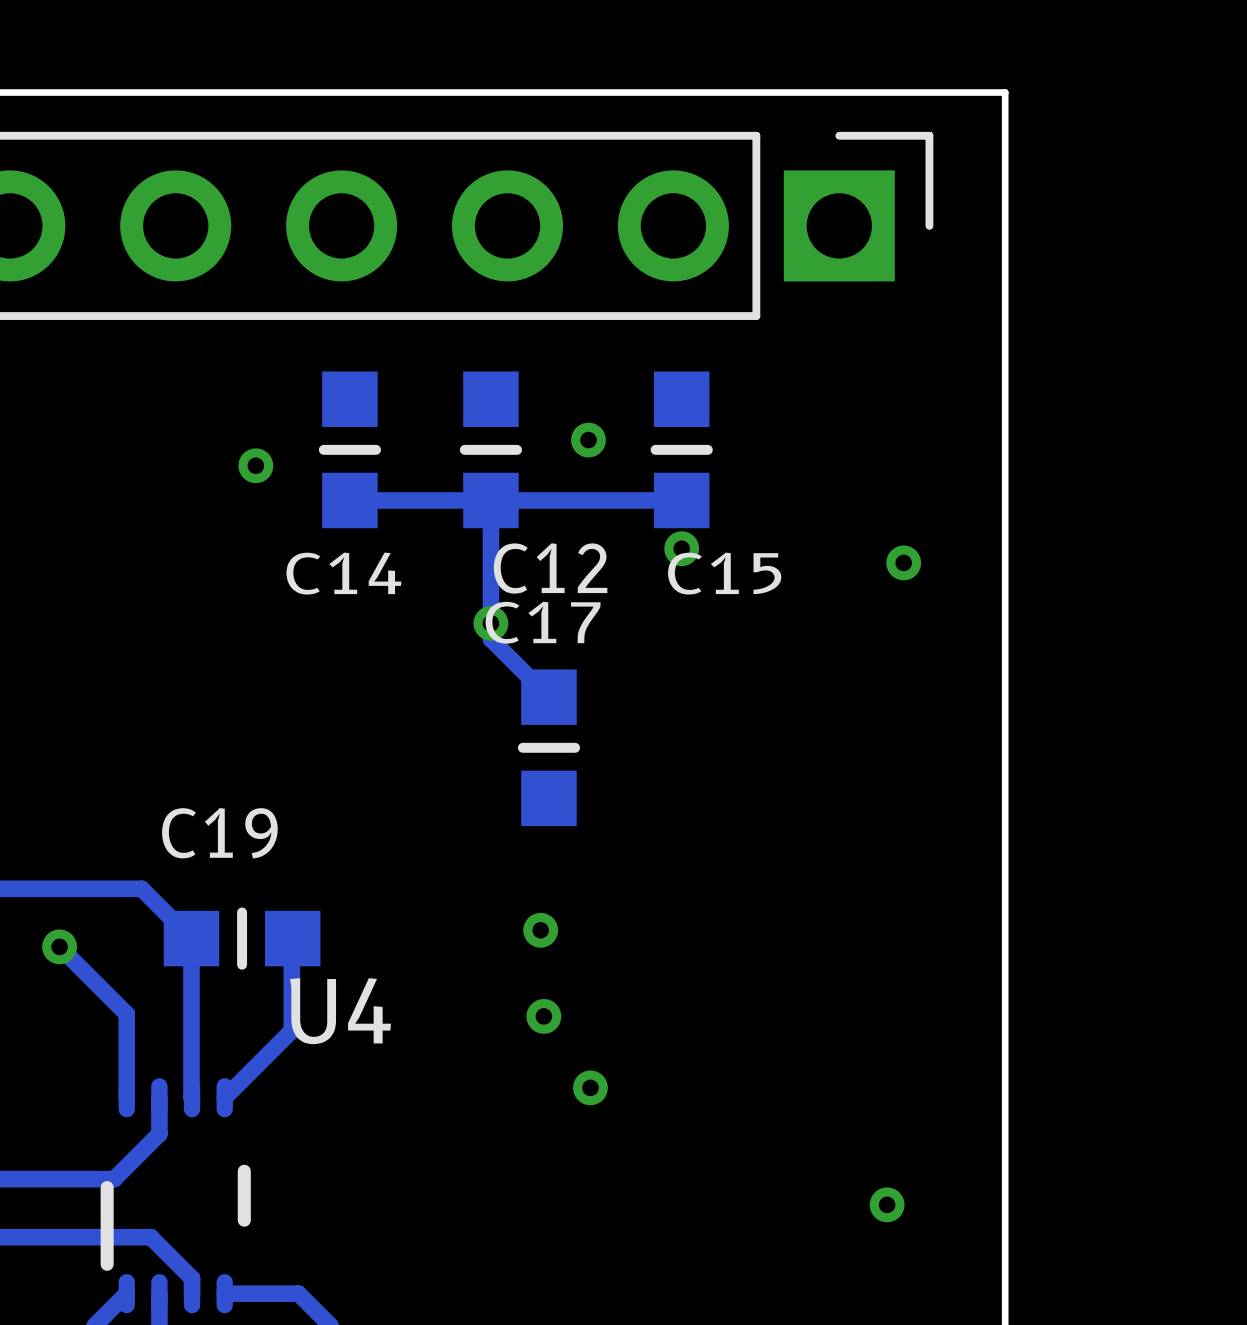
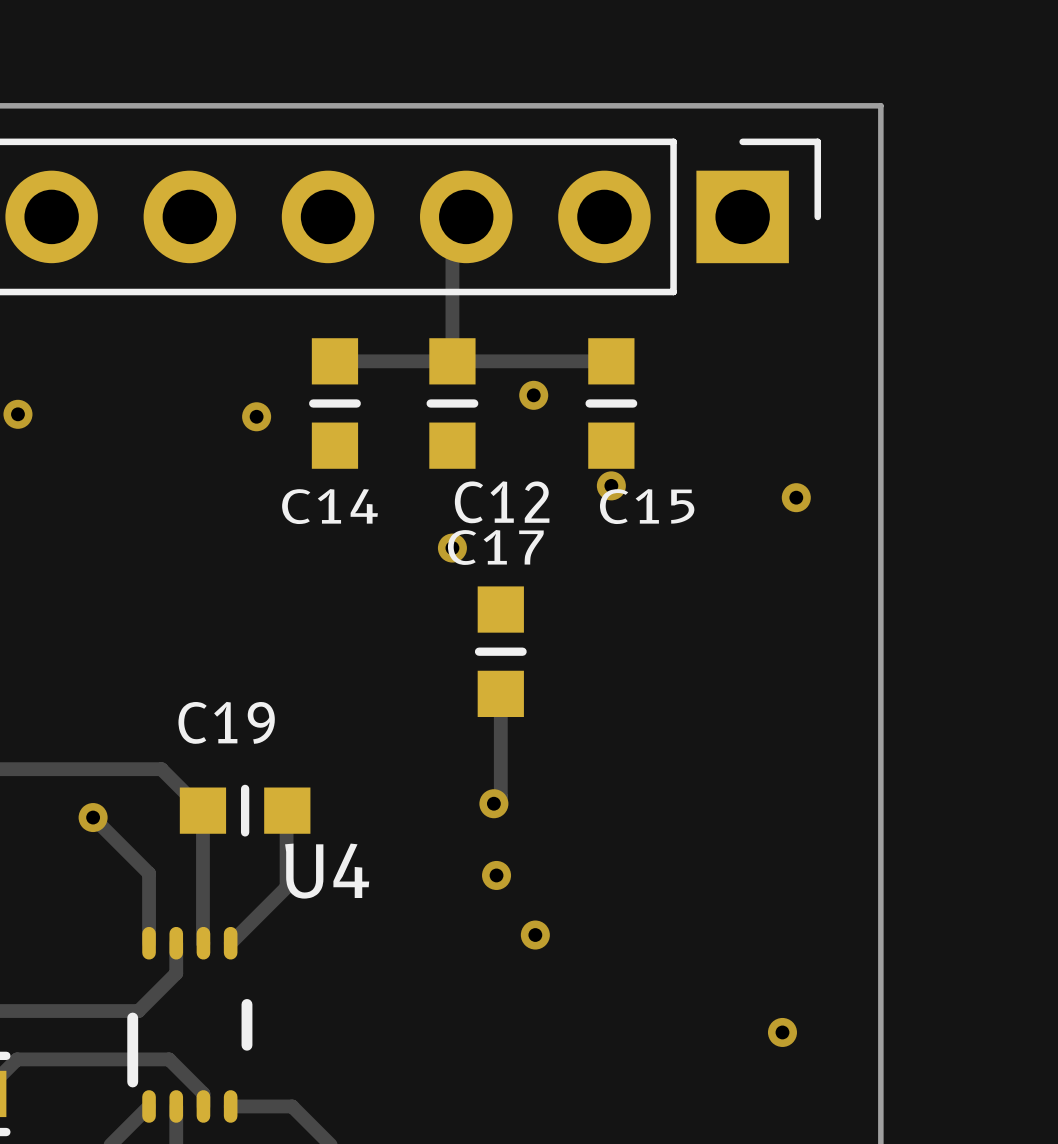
track: none -> (452, 230) (452, 361)
track: (490, 500) (490, 639) (548, 697) -> none
track: (681, 500) (349, 500) -> (611, 361) (334, 361)
track: none -> (500, 693) (500, 796) (493, 803)

